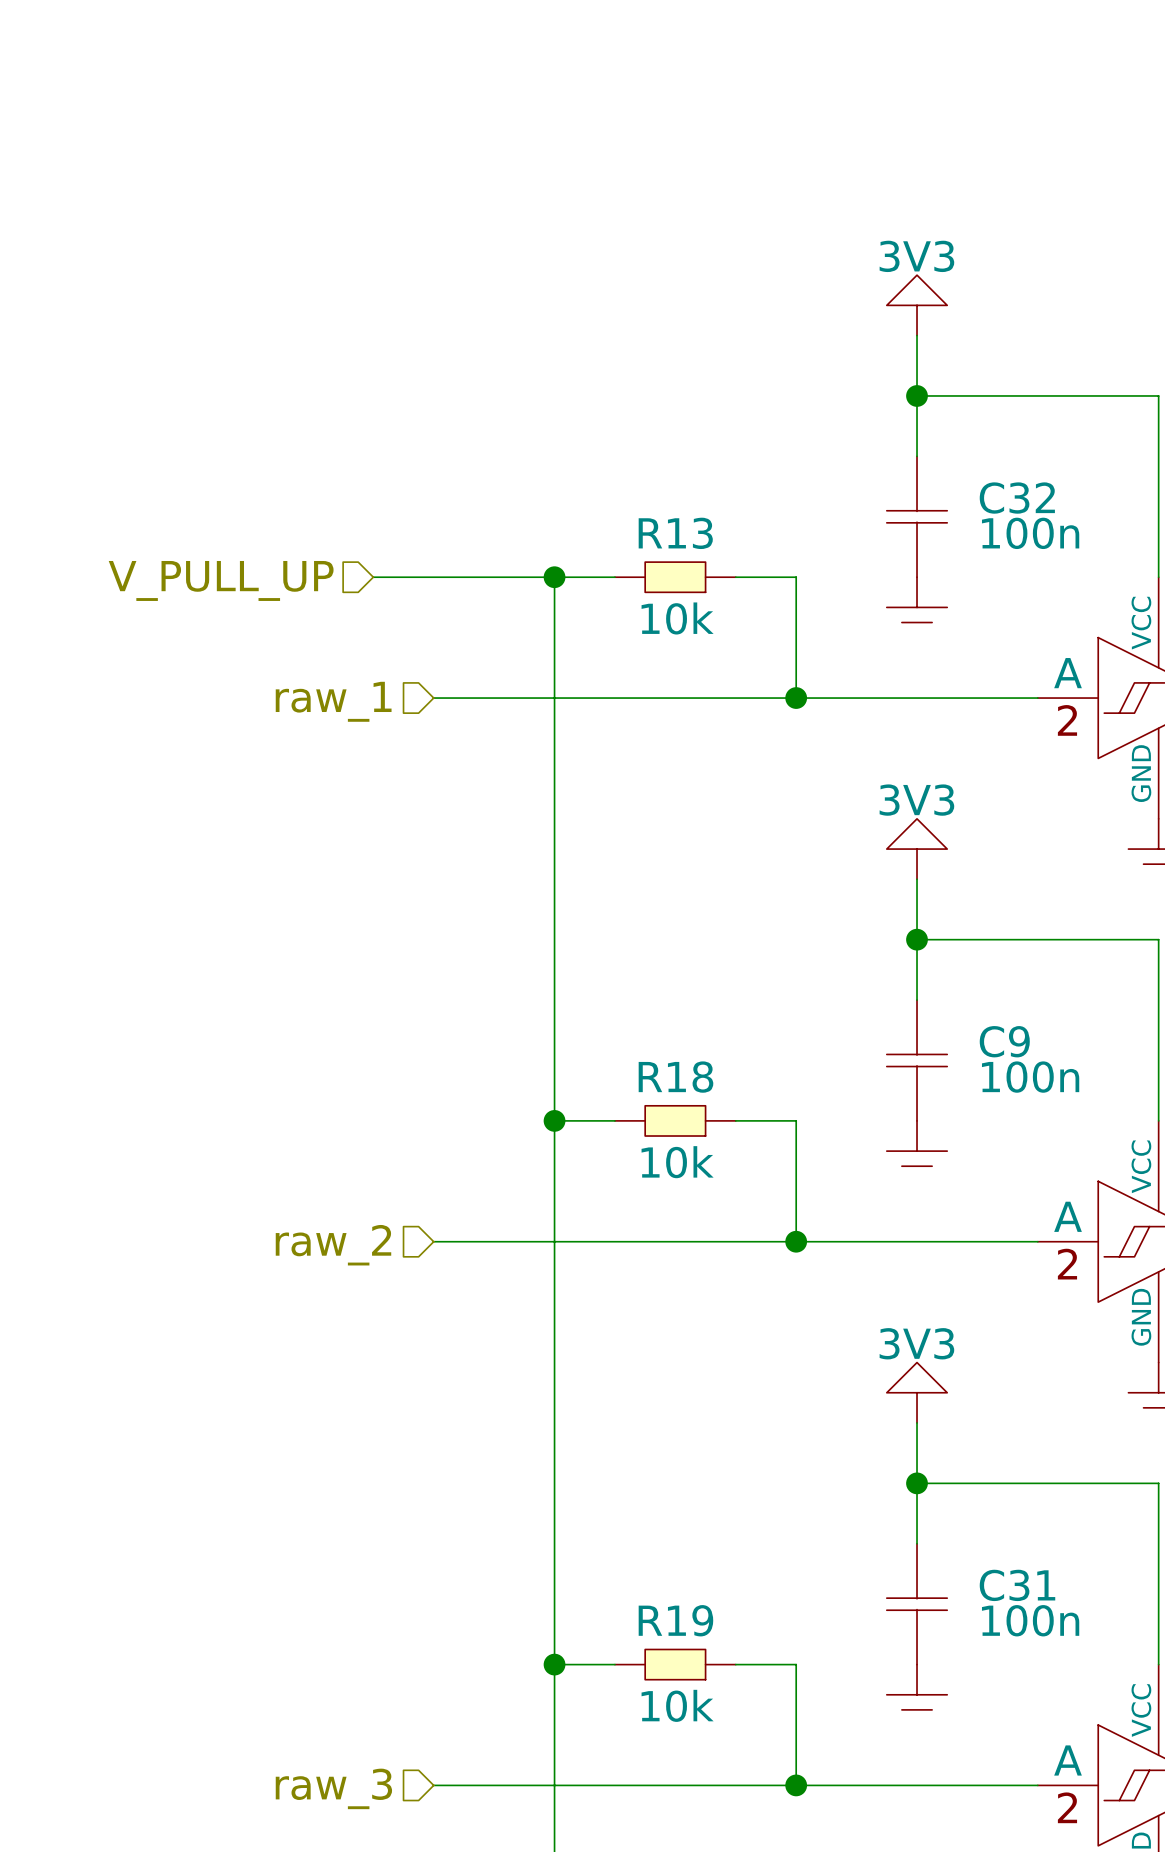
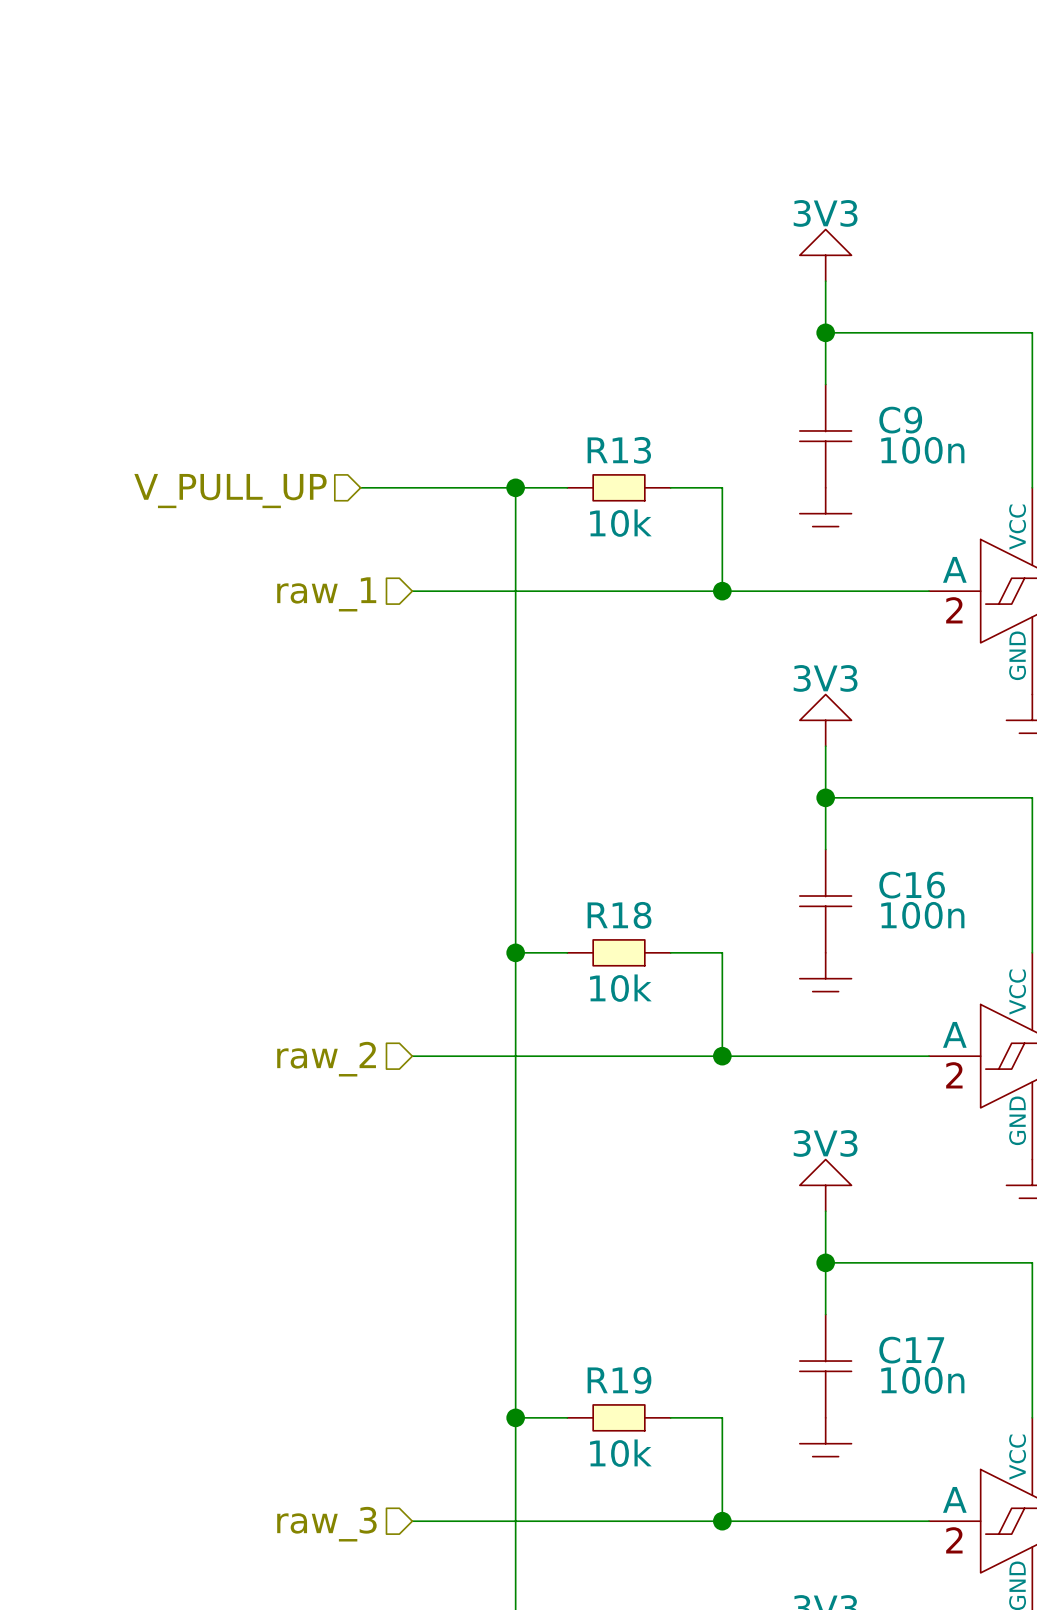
C32 name: C32 (1017, 498) -> C9 (900, 420)
C9 name: C9 (1004, 1041) -> C16 (912, 885)
C31 name: C31 (1017, 1585) -> C17 (911, 1350)

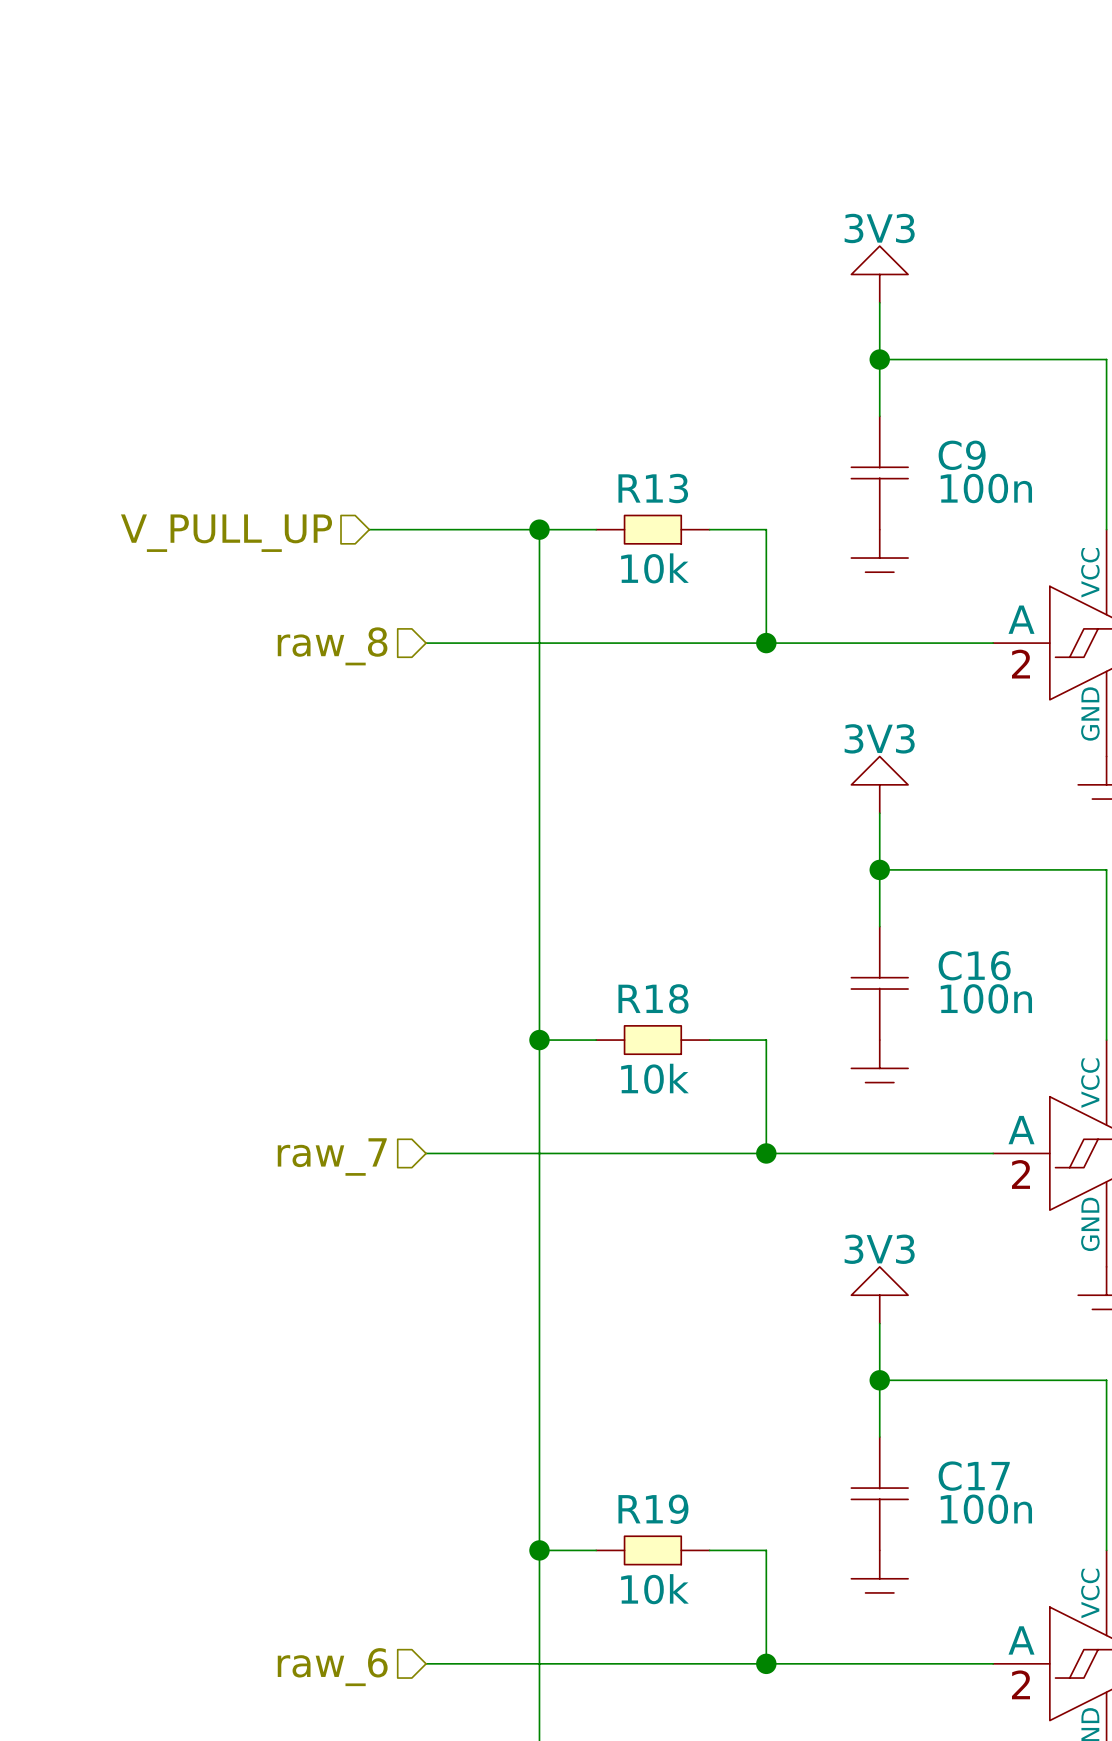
hierarchical label: raw_1 (326, 594) -> raw_8 (332, 646)
hierarchical label: raw_2 (326, 1059) -> raw_7 (332, 1156)
hierarchical label: raw_3 (326, 1524) -> raw_6 (332, 1667)

